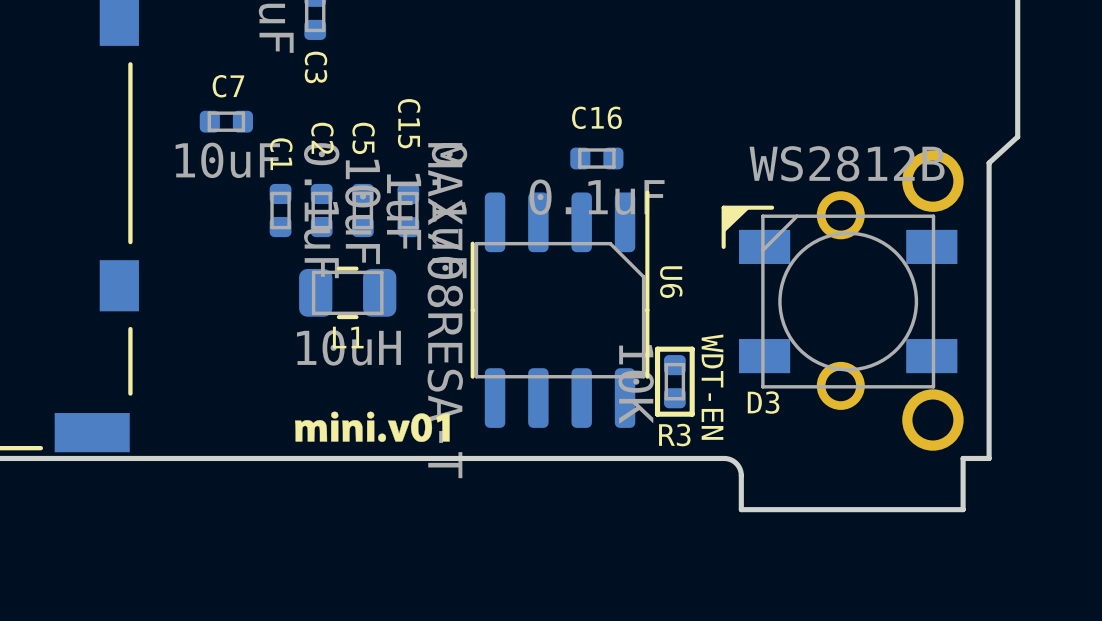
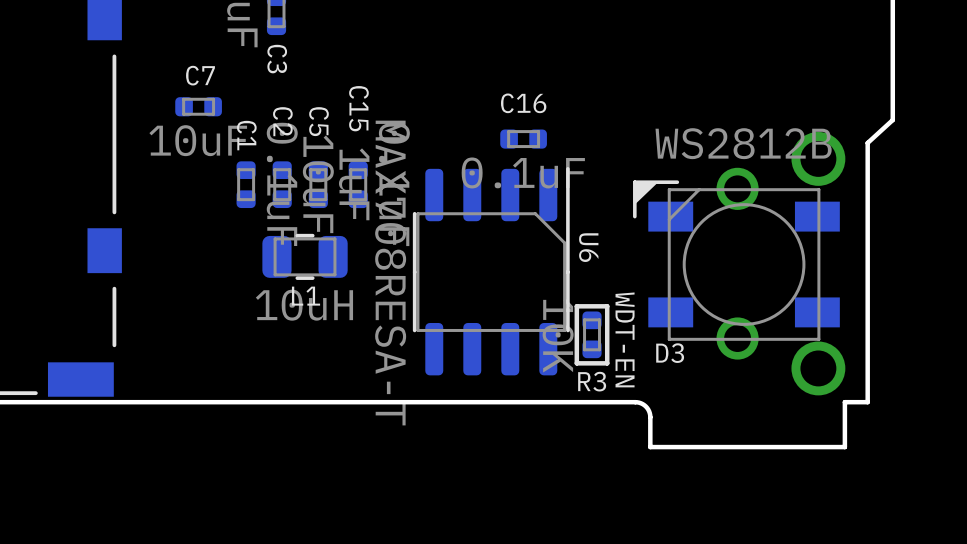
drawing: [294, 411, 450, 443] -> none

